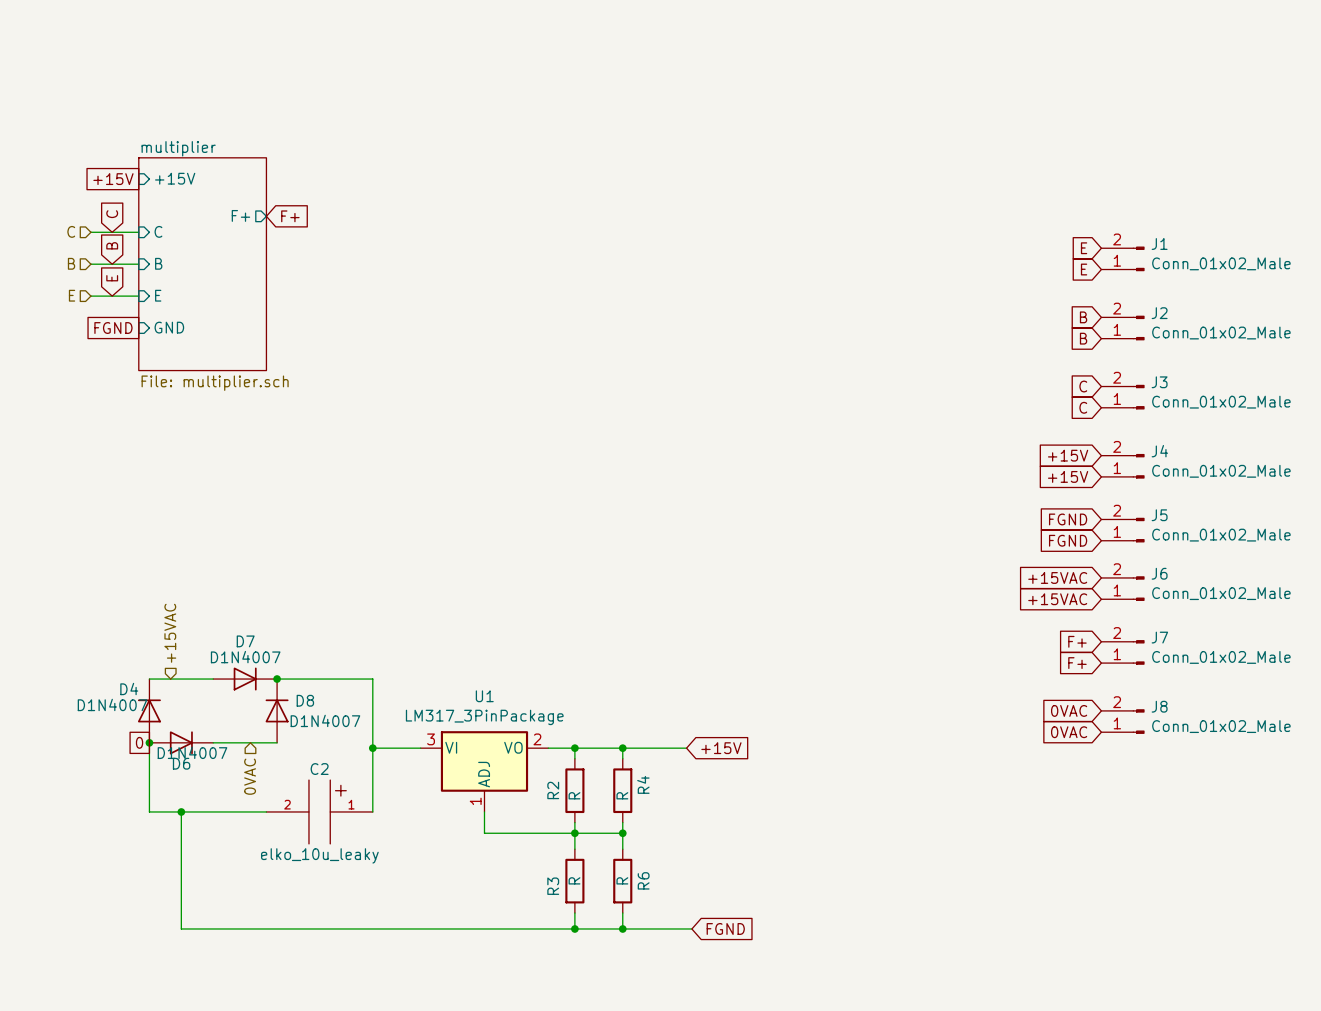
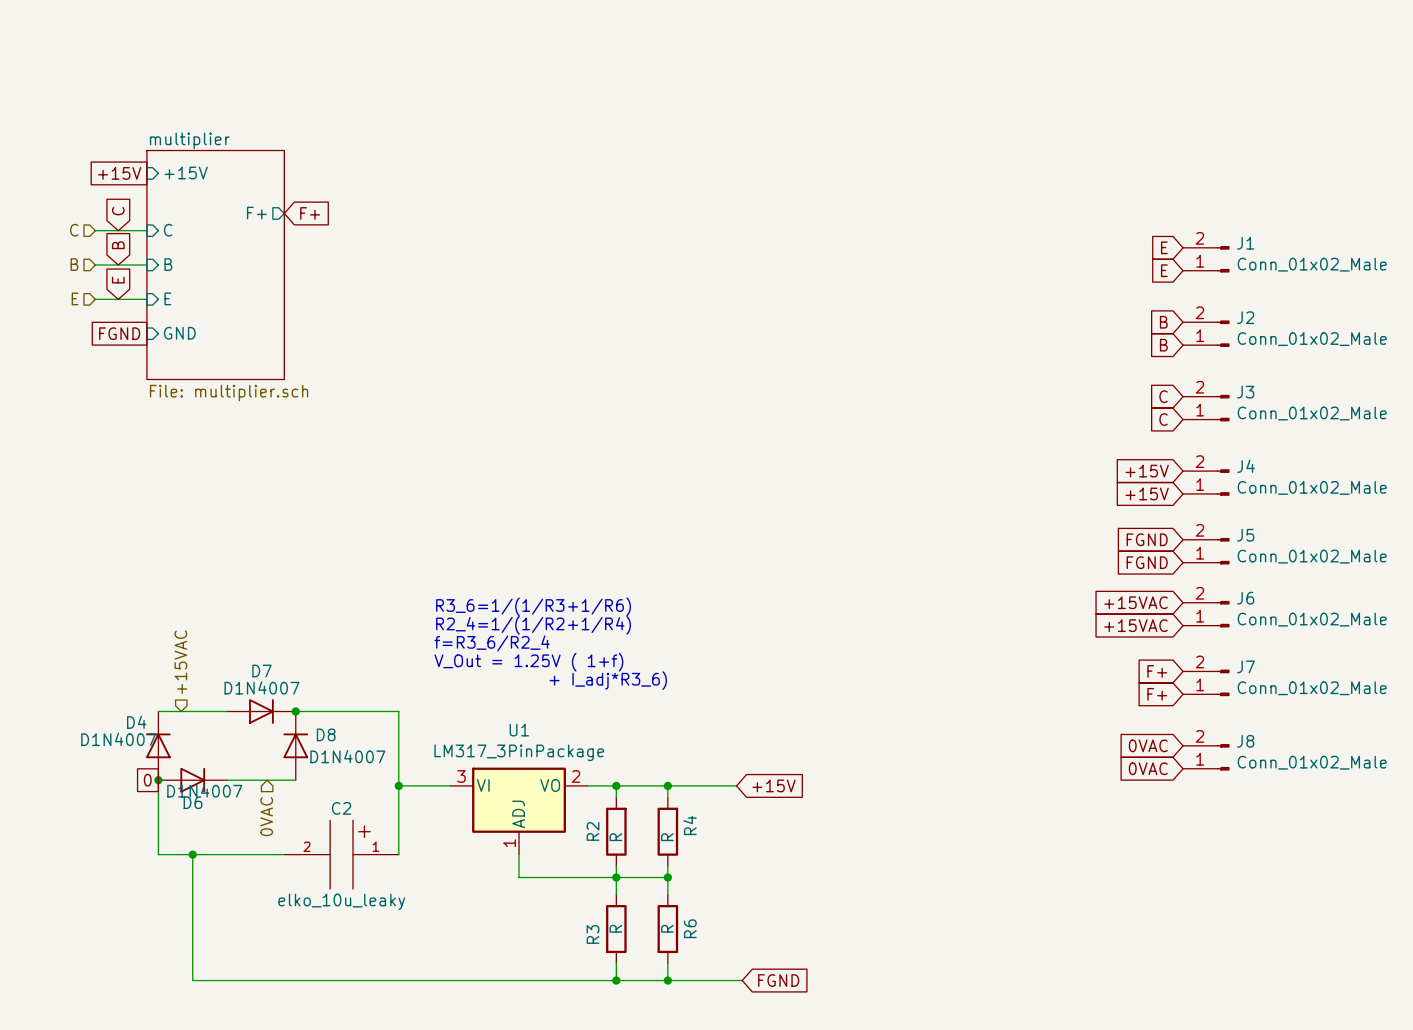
text: none -> R3_6=1/(1/R3+1/R6) (533, 606)
text: none -> R2_4=1/(1/R2+1/R4) (533, 625)
text: none -> f=R3_6/R2_4 (492, 643)
text: none -> V_Out = 1.25V ( 1+f) (528, 662)
text: none -> + I_adj*R3_6) (608, 680)

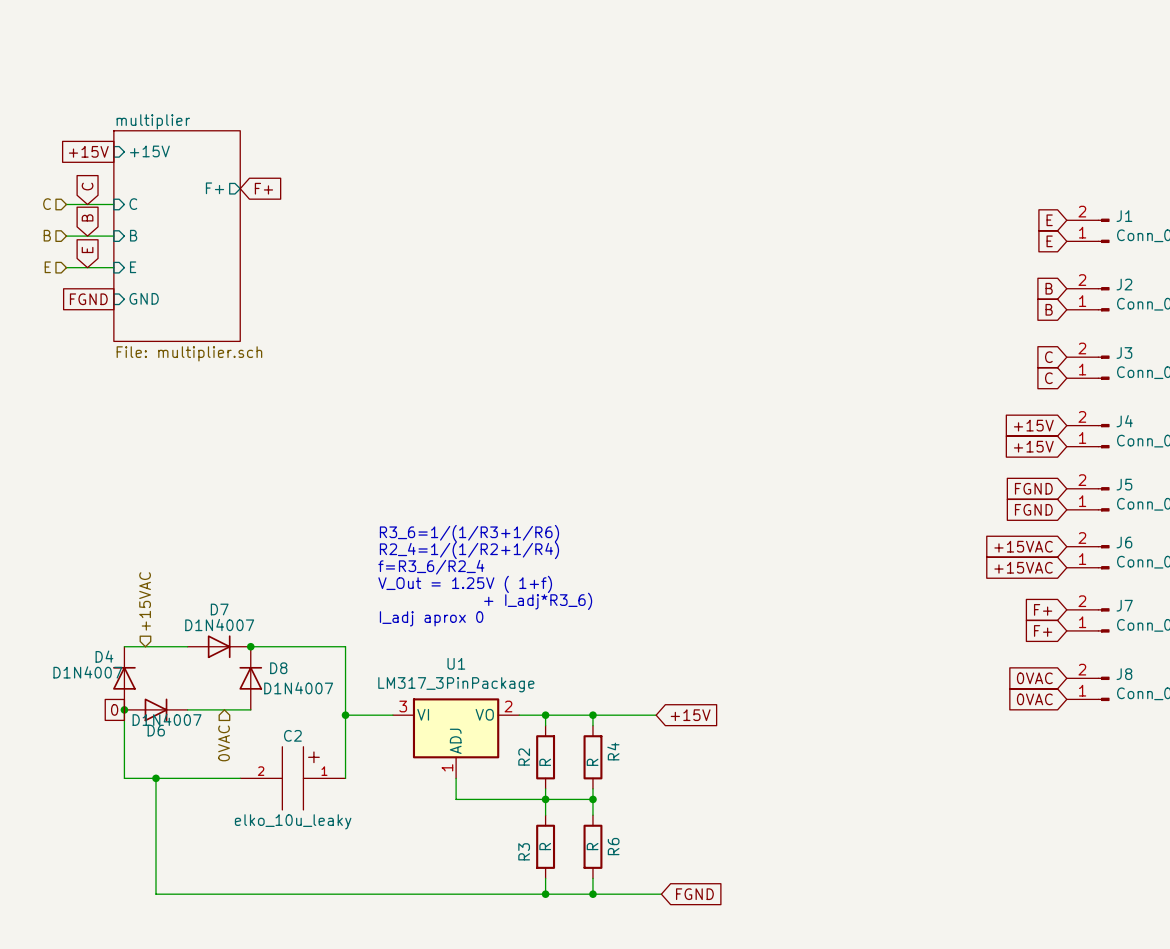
text: none -> R3_6=1/(1/R3+1/R6) (469, 533)
text: R3_6=1/(1/R3+1/R6) (533, 606) -> R2_4=1/(1/R2+1/R4) (469, 550)
text: R2_4=1/(1/R2+1/R4) (533, 625) -> f=R3_6/R2_4 (431, 567)
text: f=R3_6/R2_4 (492, 643) -> V_Out = 1.25V ( 1+f) (465, 584)
text: V_Out = 1.25V ( 1+f) (528, 662) -> + I_adj*R3_6) (538, 601)
text: + I_adj*R3_6) (608, 680) -> I_adj aprox 0 (431, 618)

